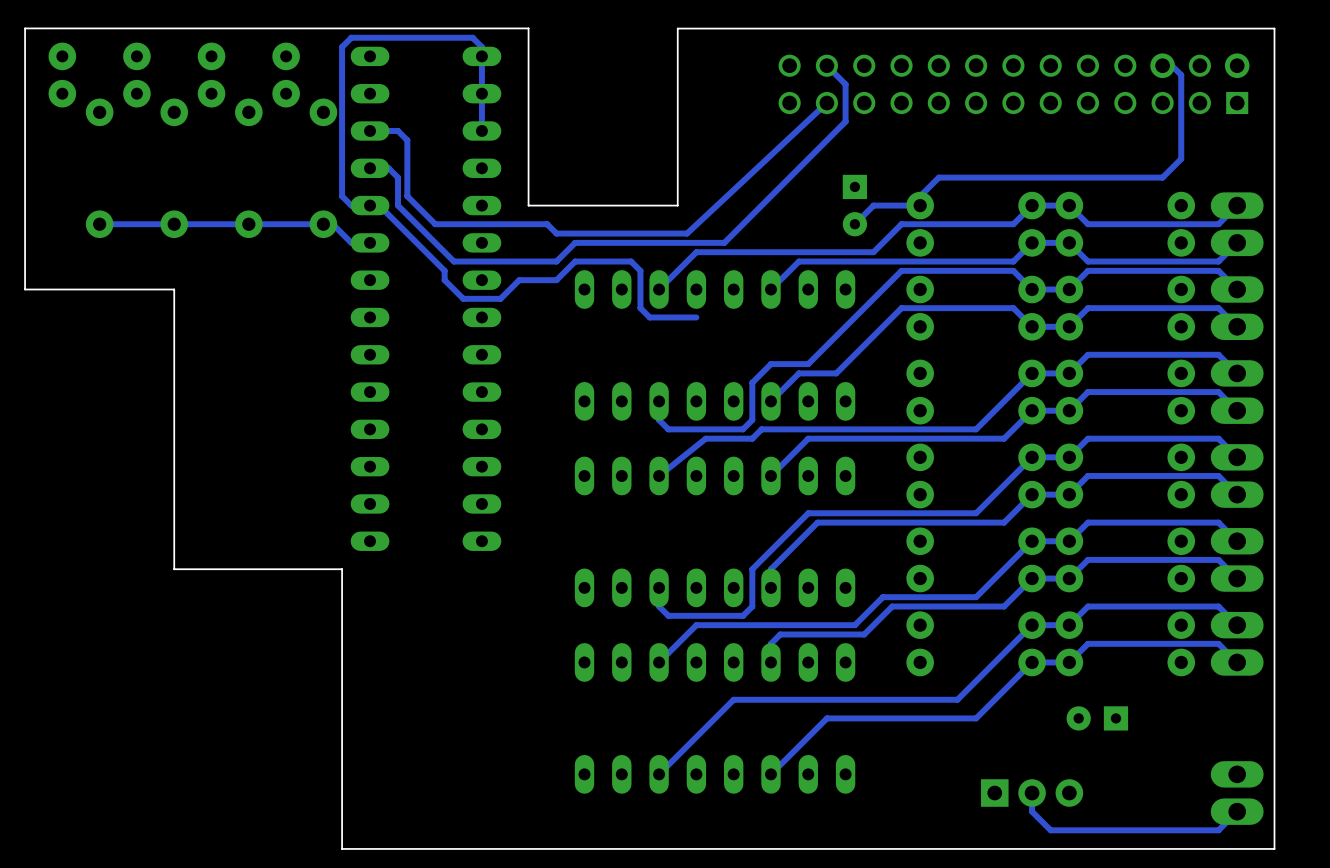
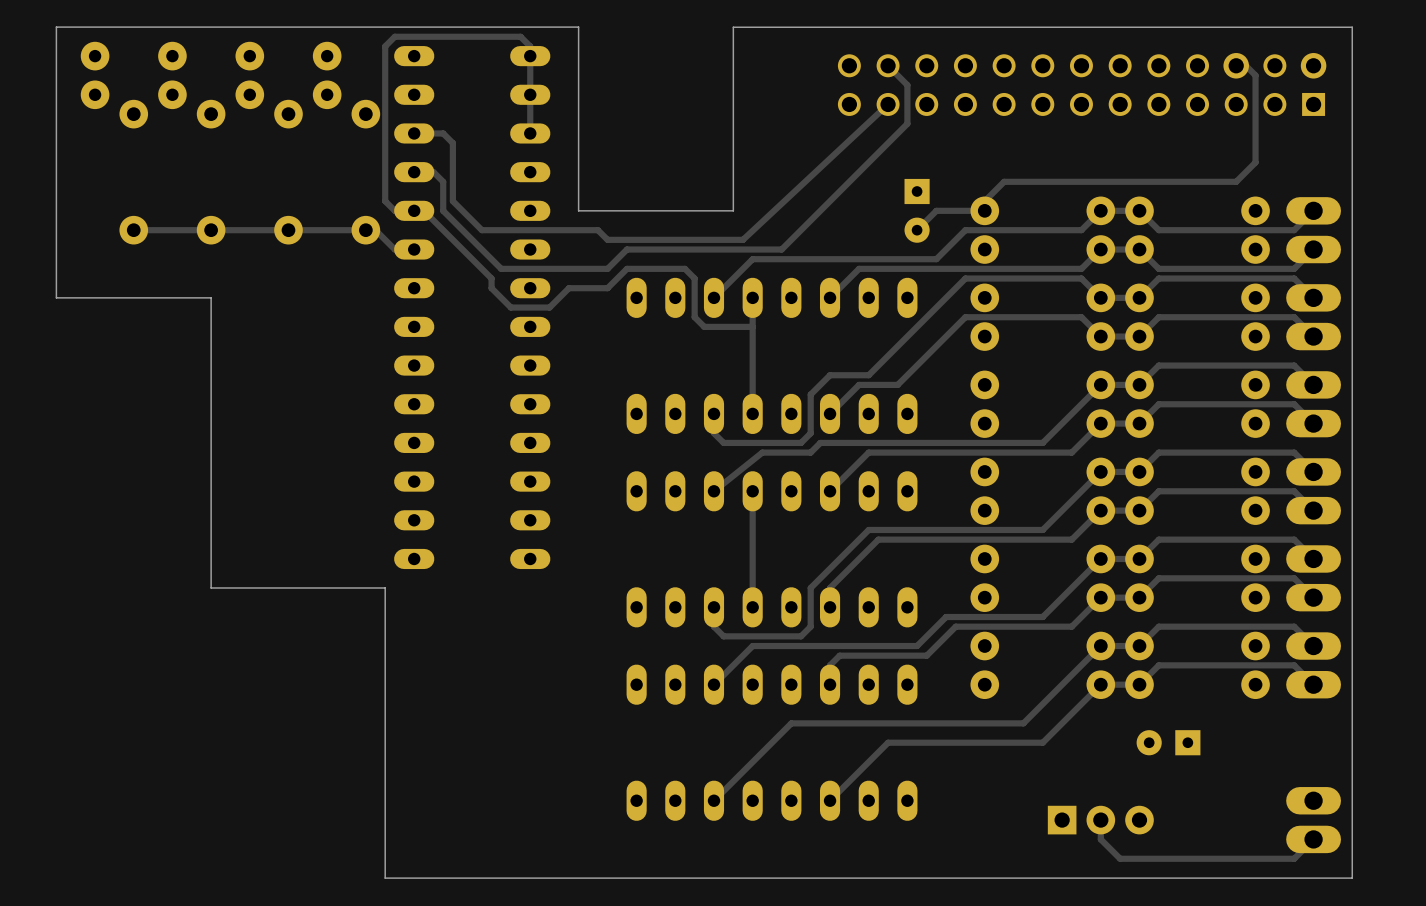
track: none -> (752, 297) (752, 413)
track: none -> (752, 491) (752, 607)

